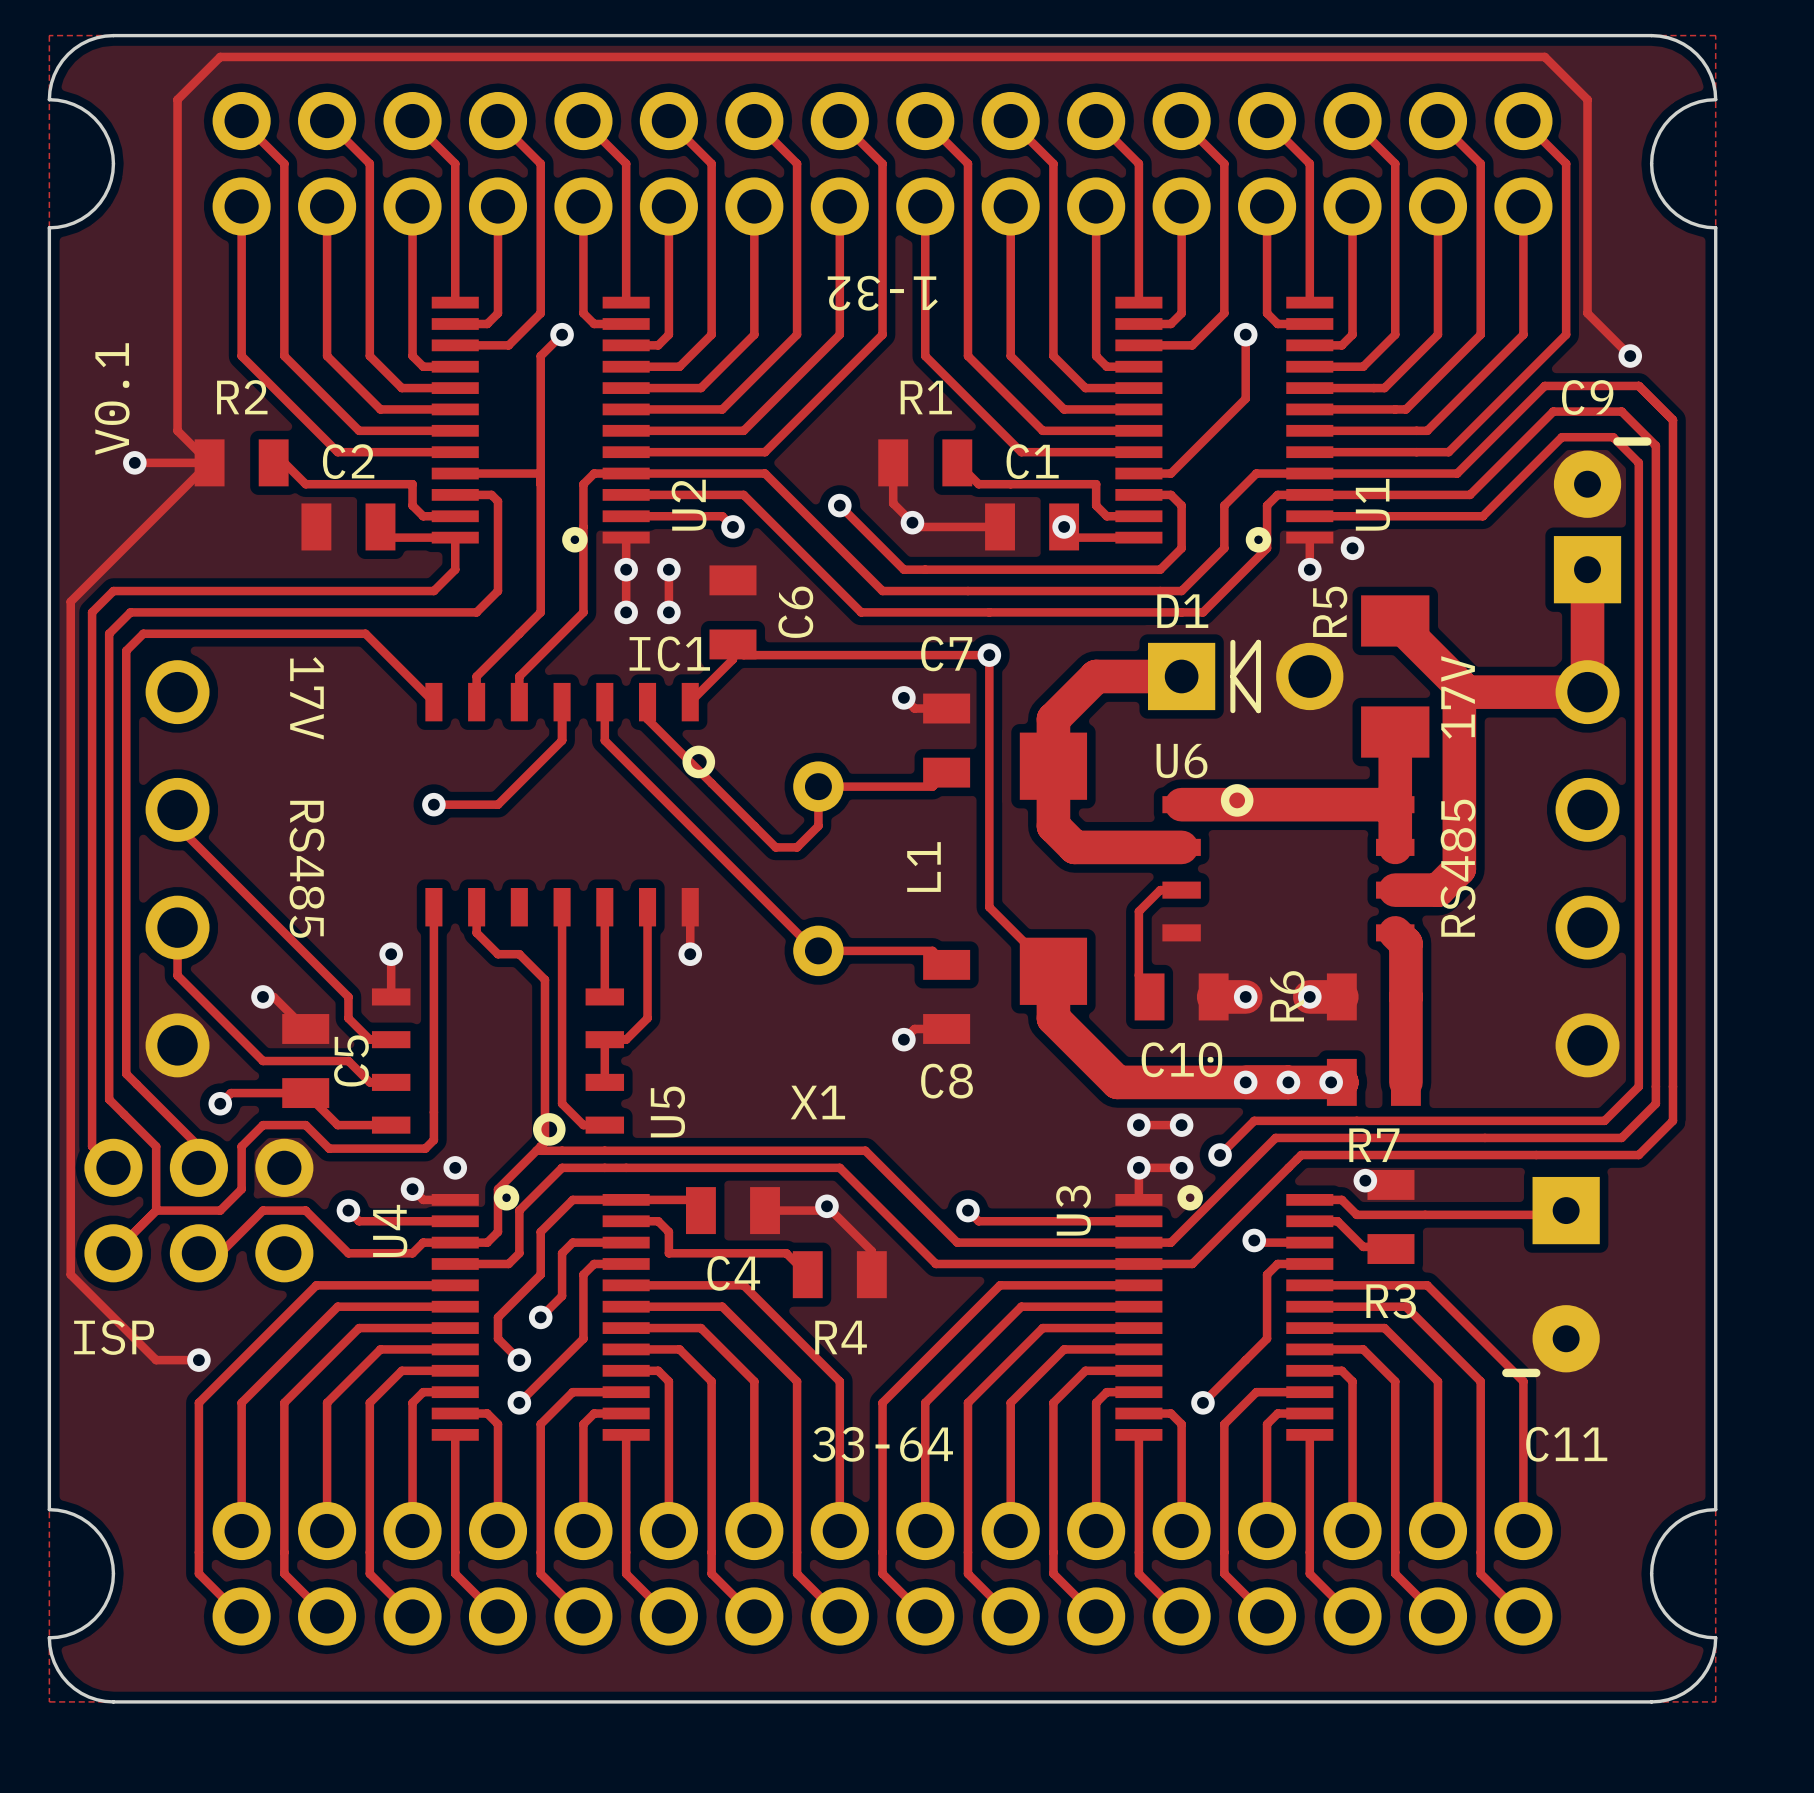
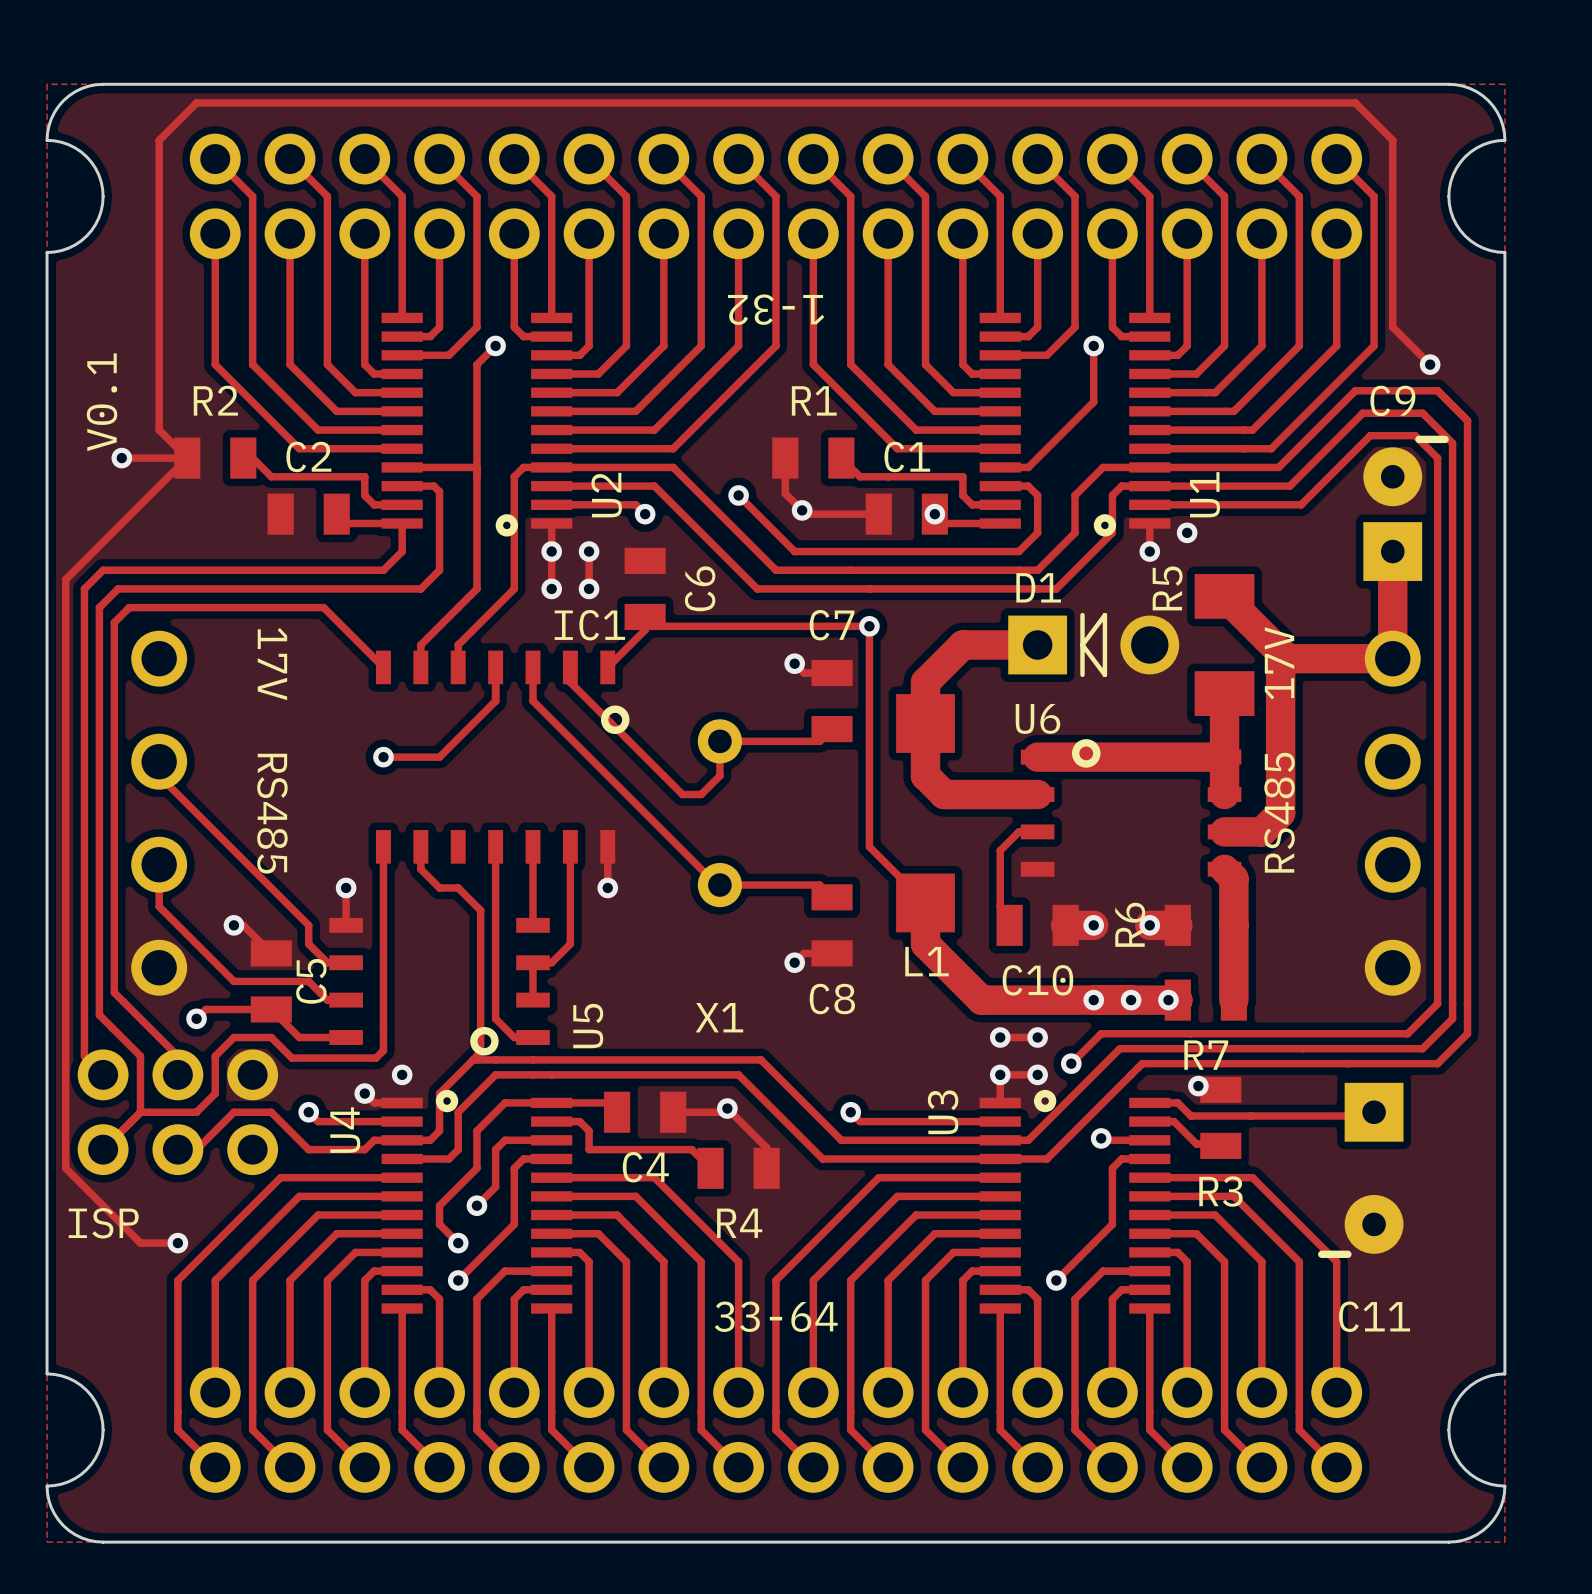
L1 name rotation: 0° (924, 867) -> 90° clockwise (927, 961)
L1 name position: L1 (924, 867) -> L1 (927, 961)

